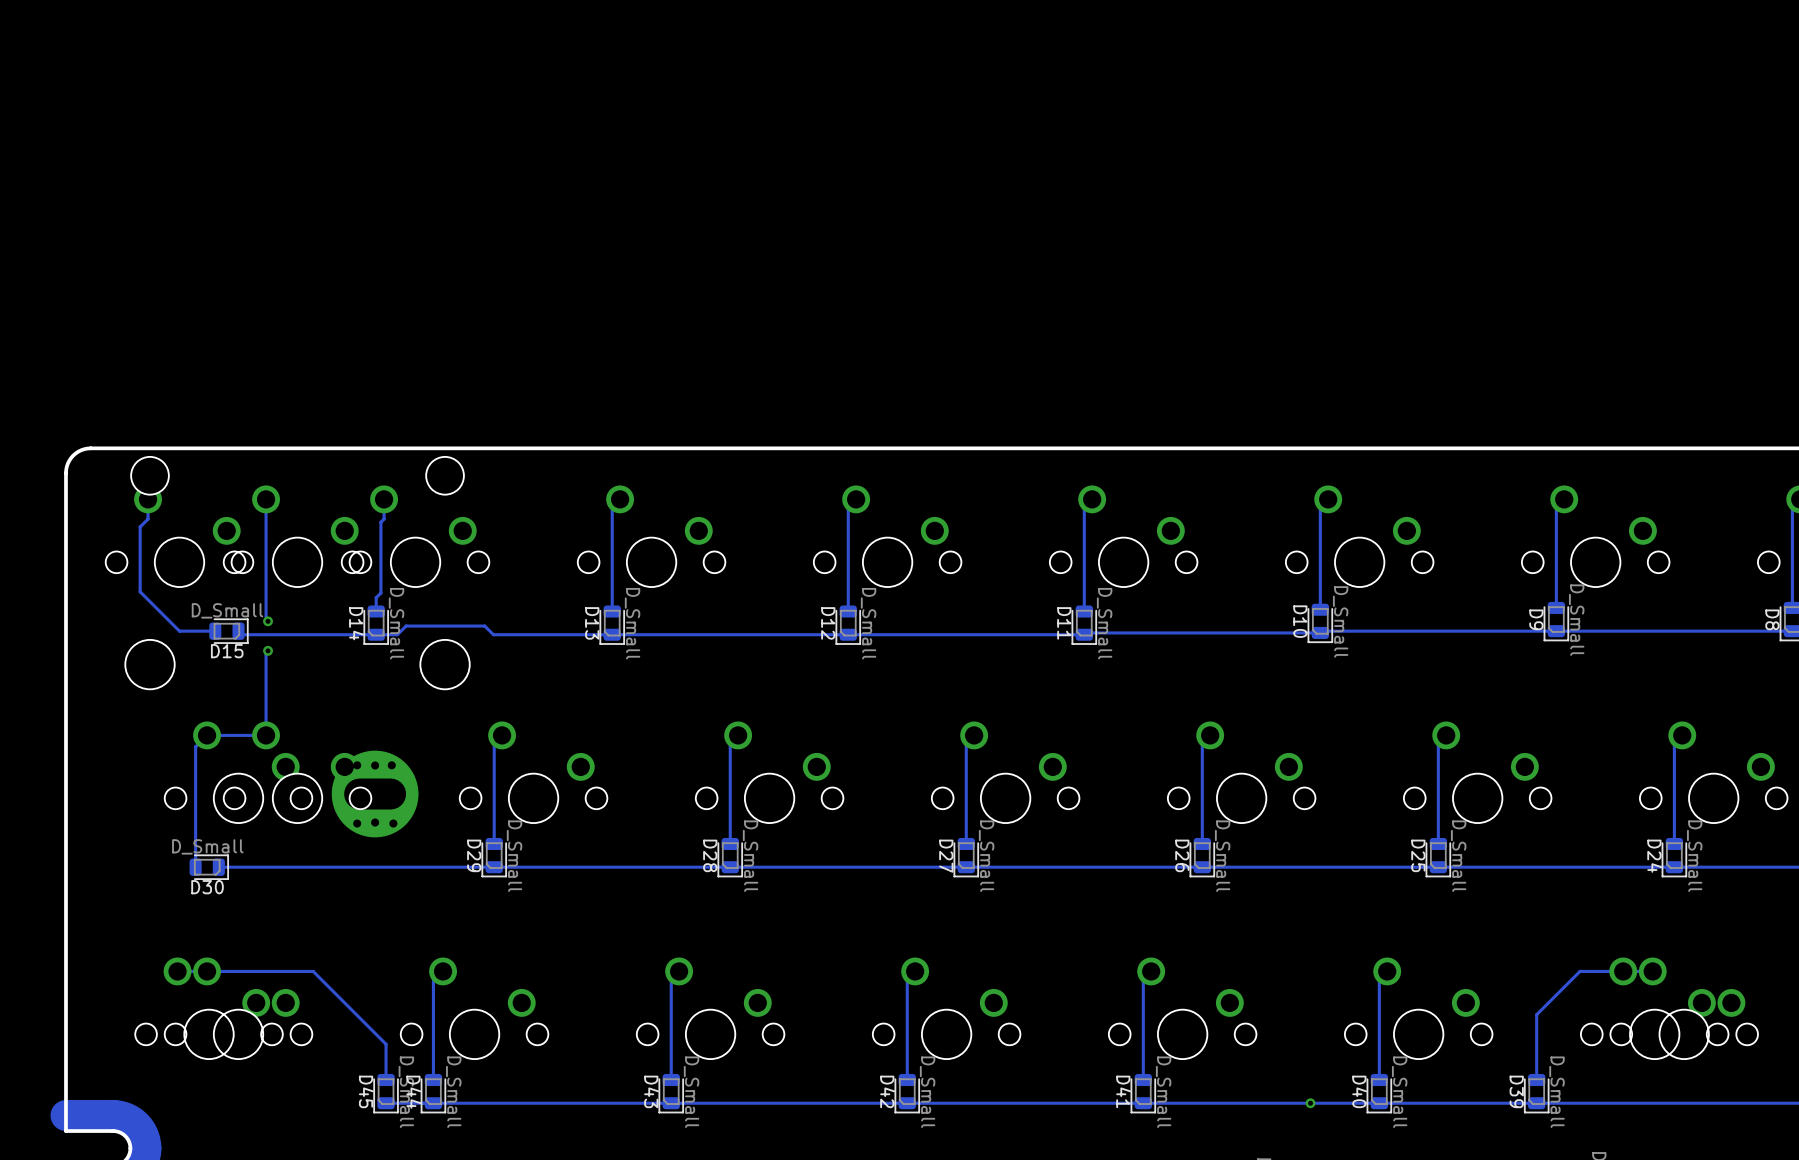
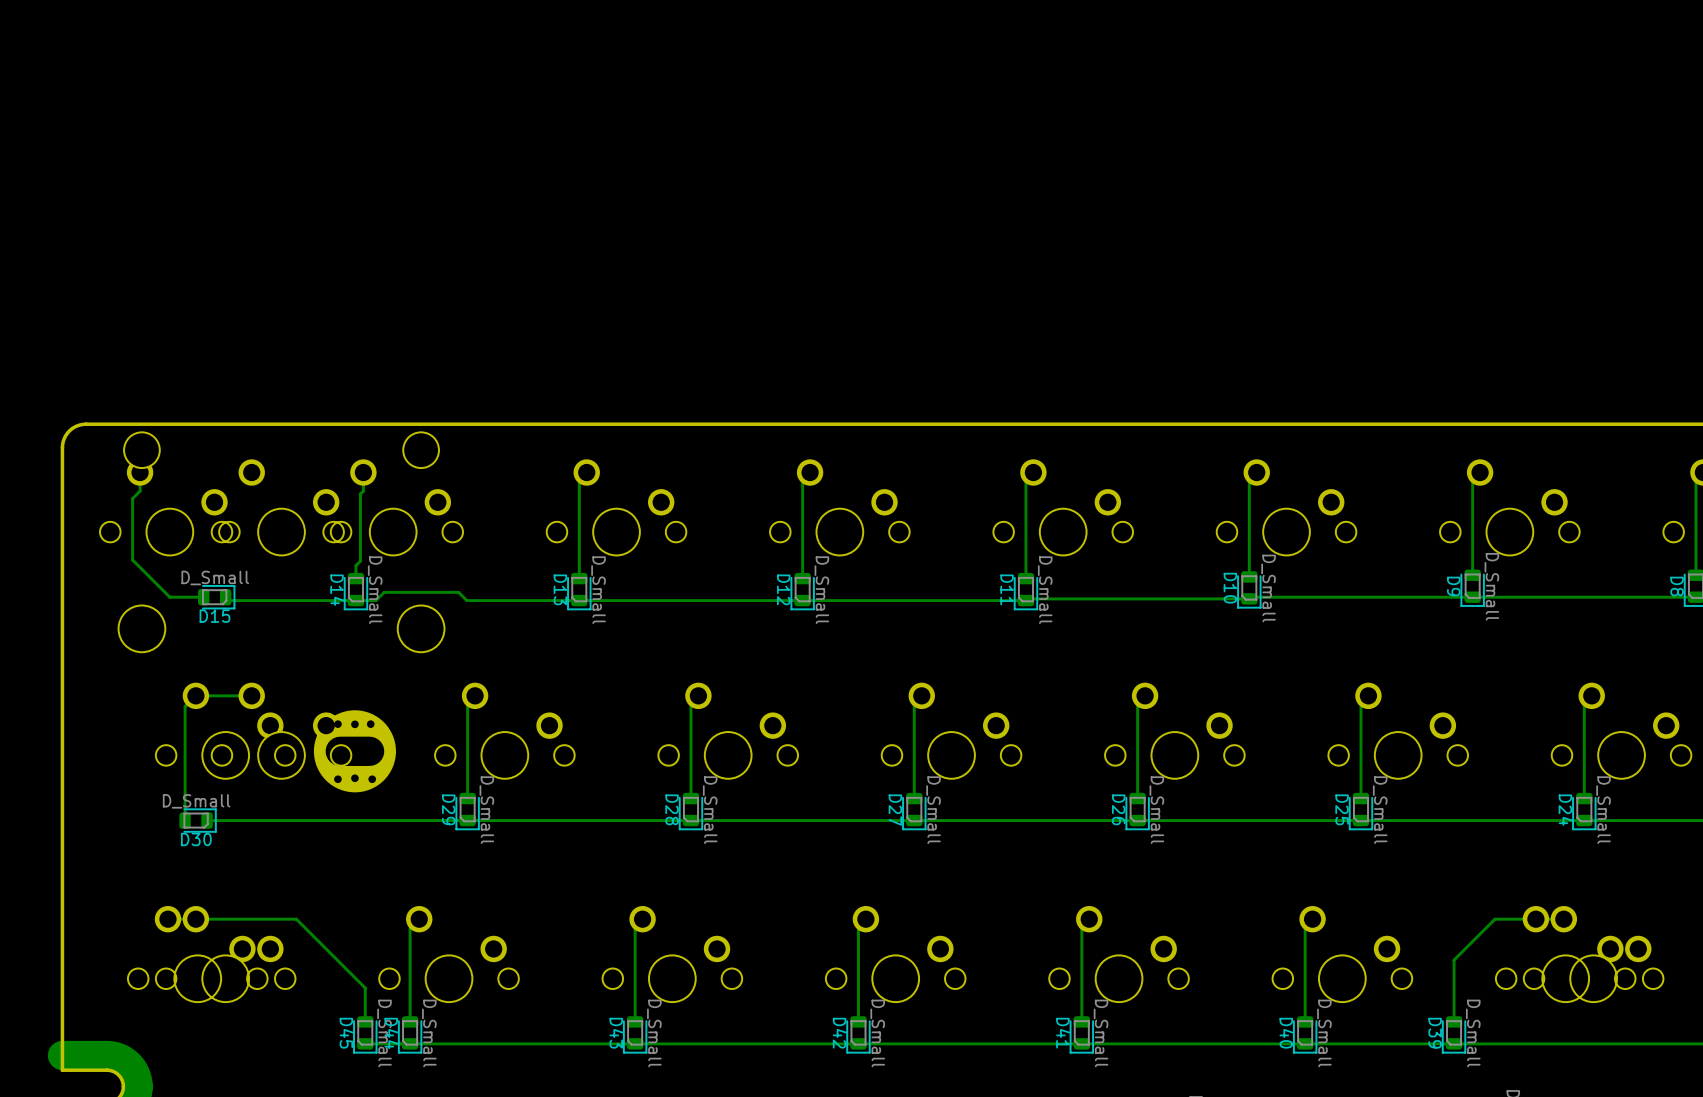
track: (266, 499) (266, 619) (268, 621) -> none
via: (268, 621) -> none
track: (268, 650) (266, 652) (266, 735) -> none
via: (268, 650) -> none
via: (1310, 1103) -> none

